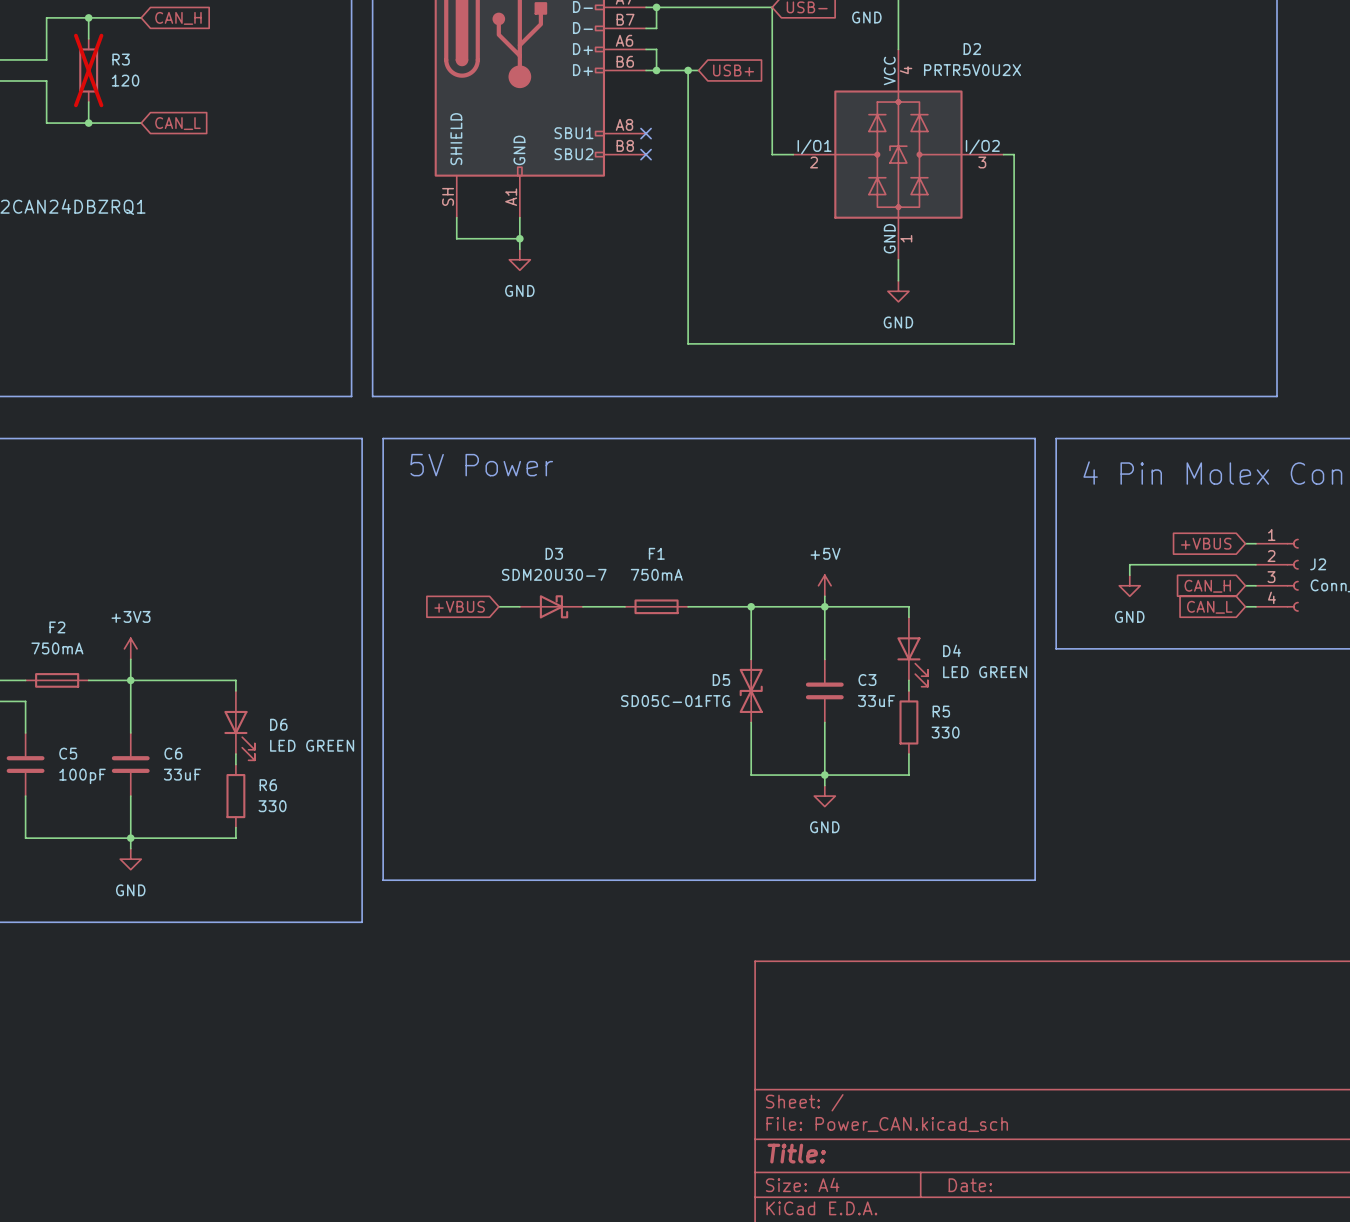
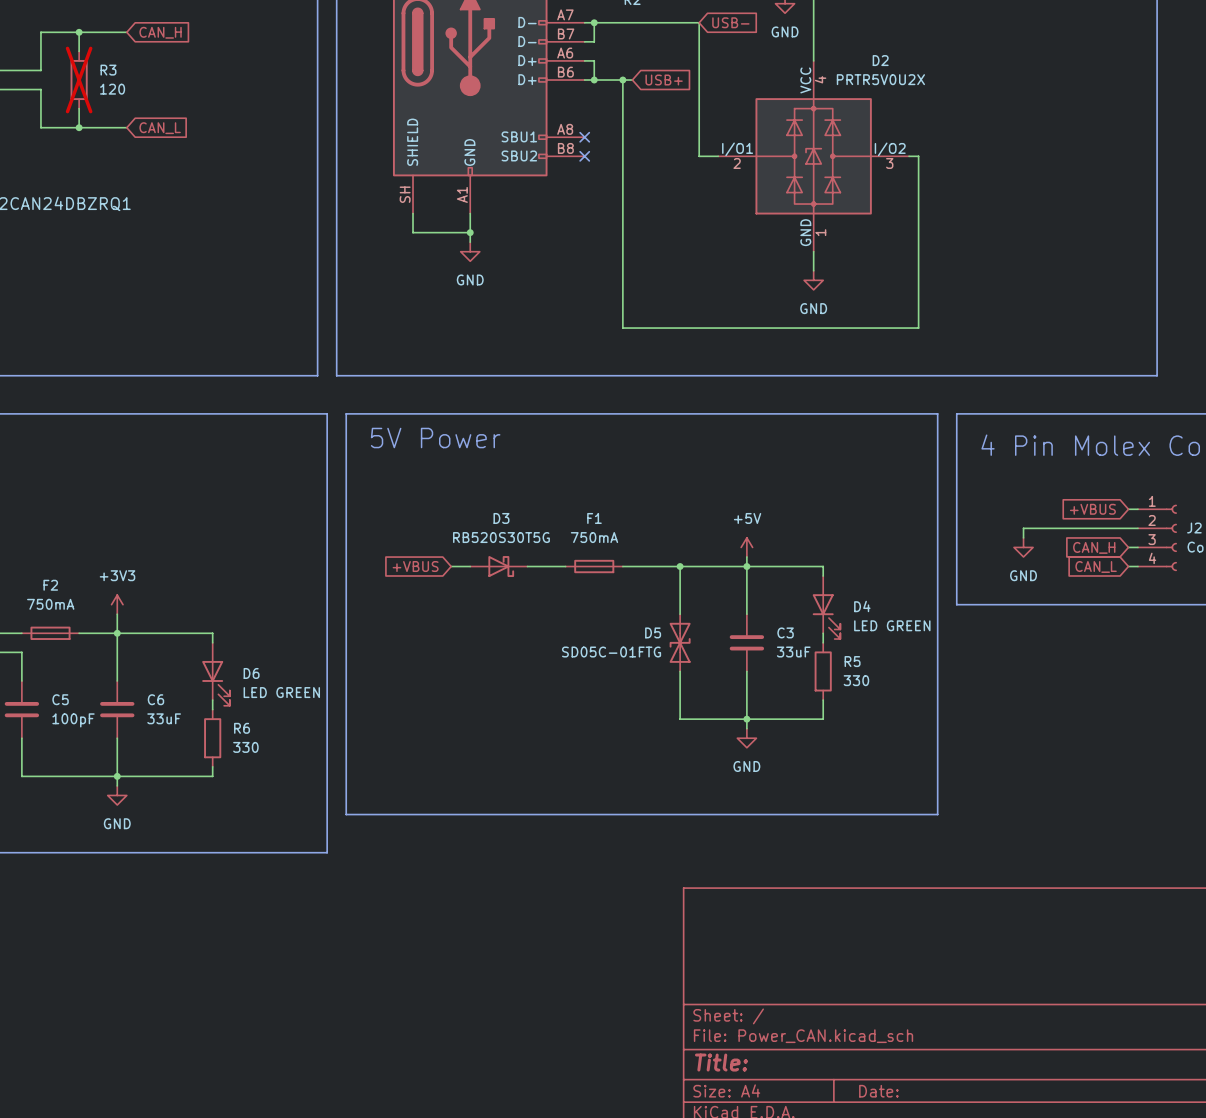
D3 value: SDM20U30-7 (554, 574) -> RB520S30T5G (501, 537)

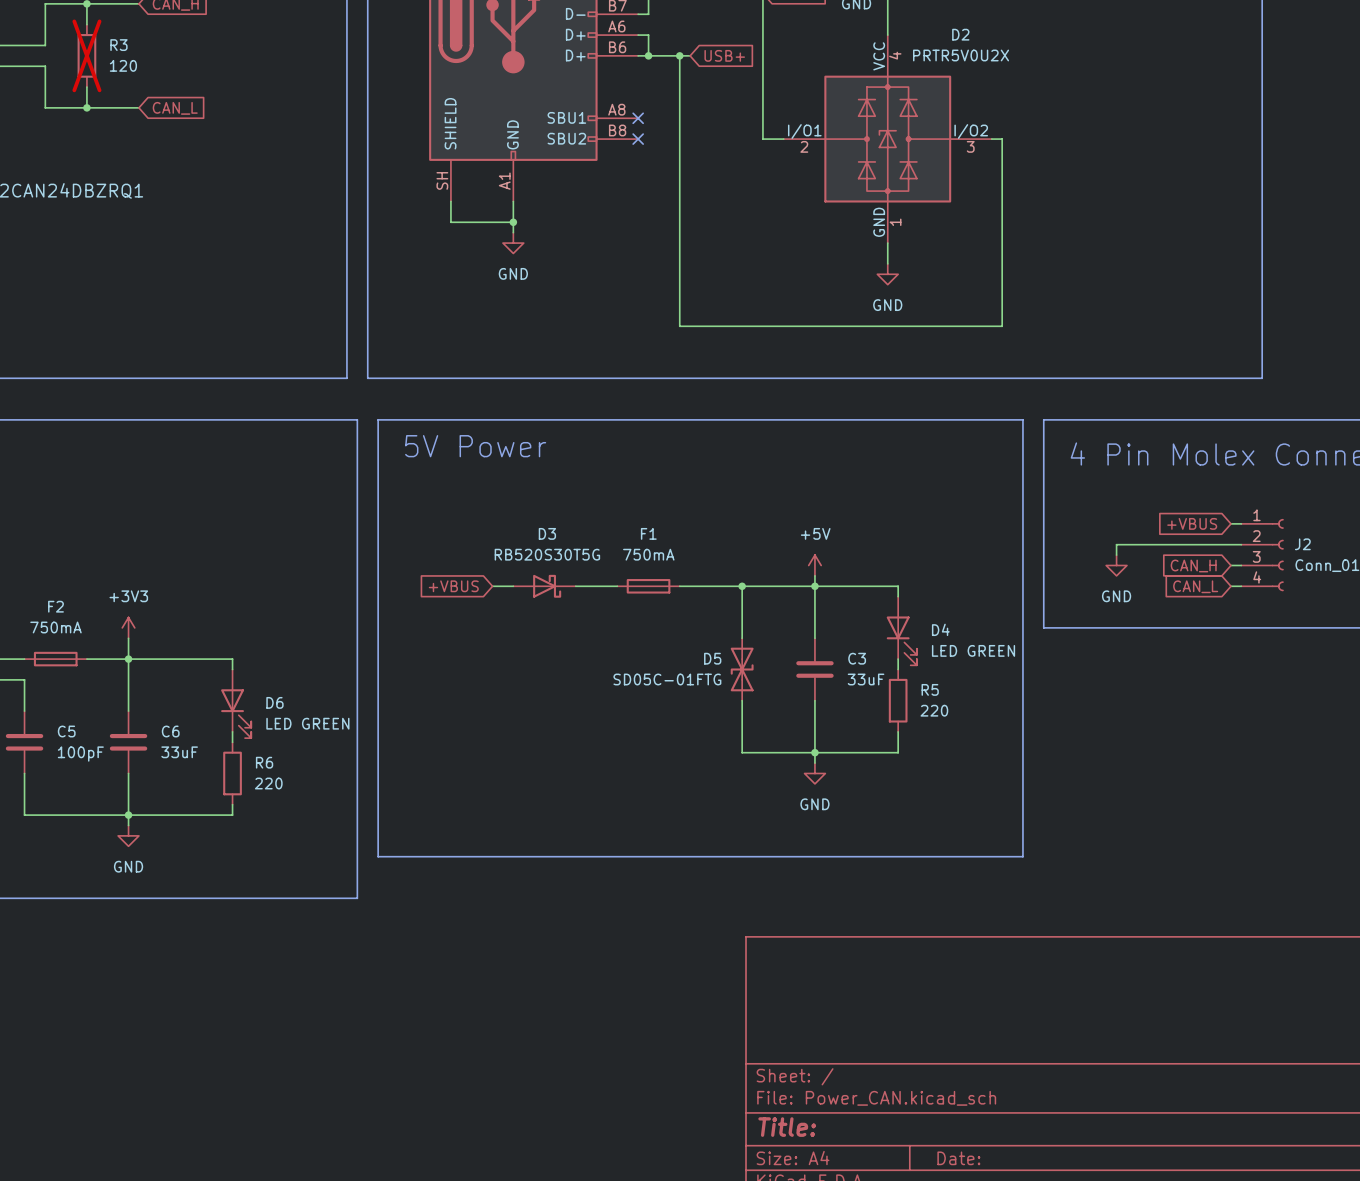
R5 value: 330 (856, 680) -> 220 (934, 710)
R6 value: 330 (245, 747) -> 220 (268, 783)

